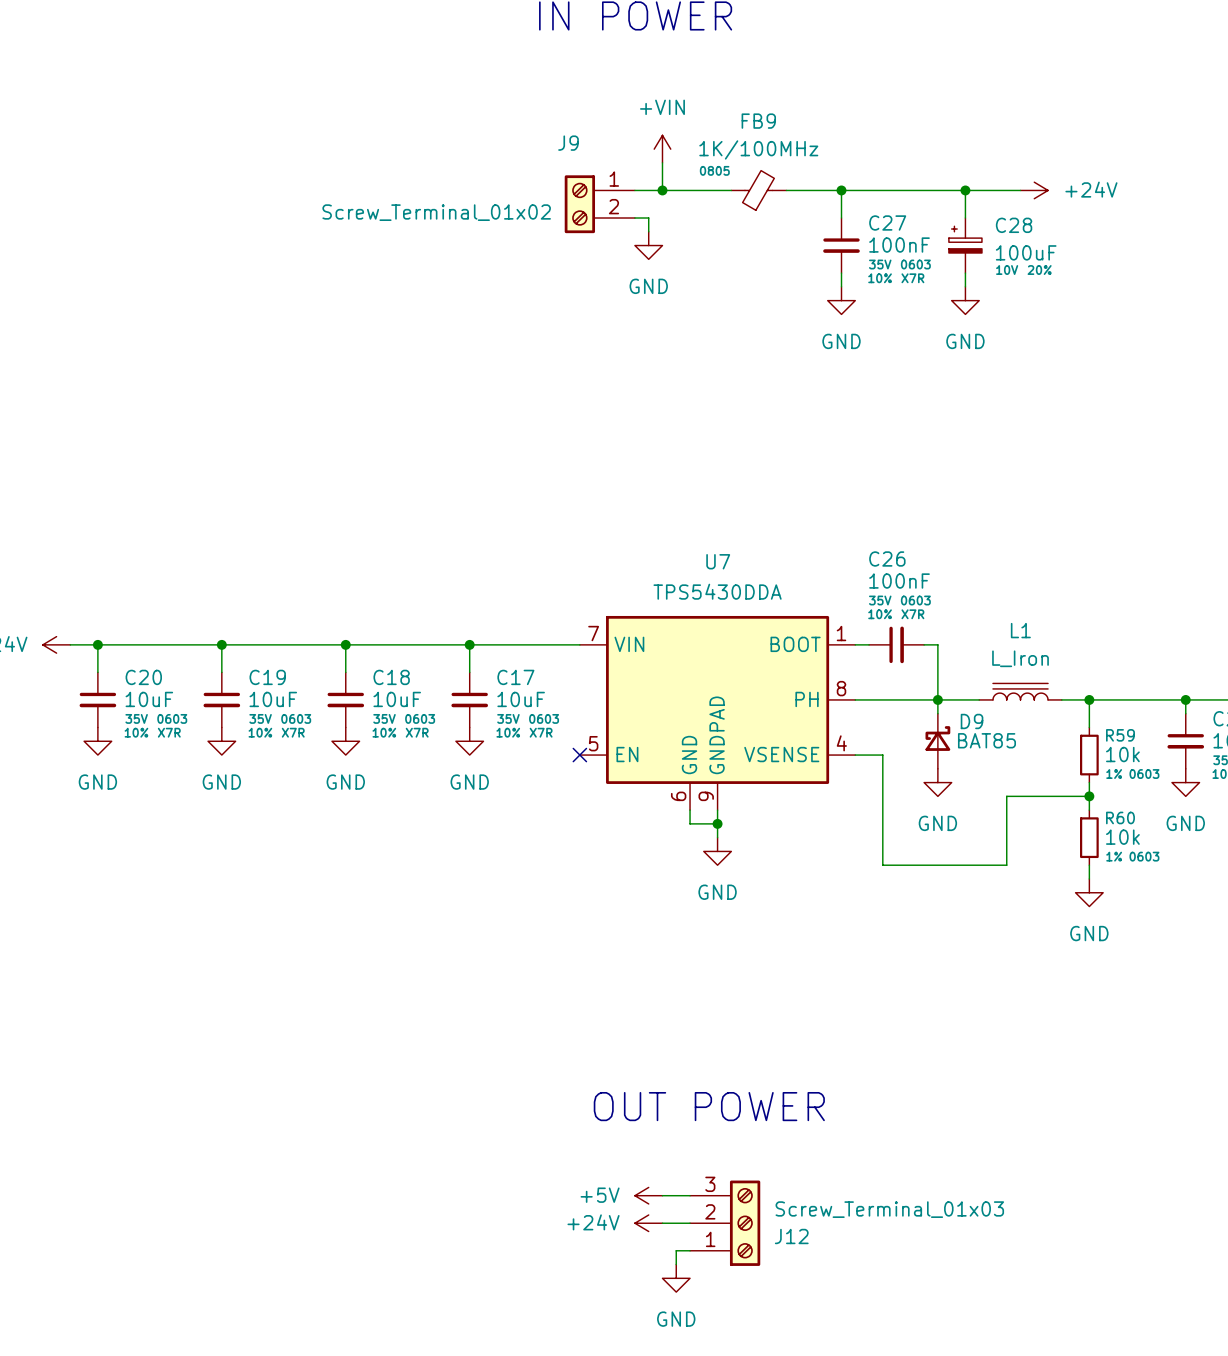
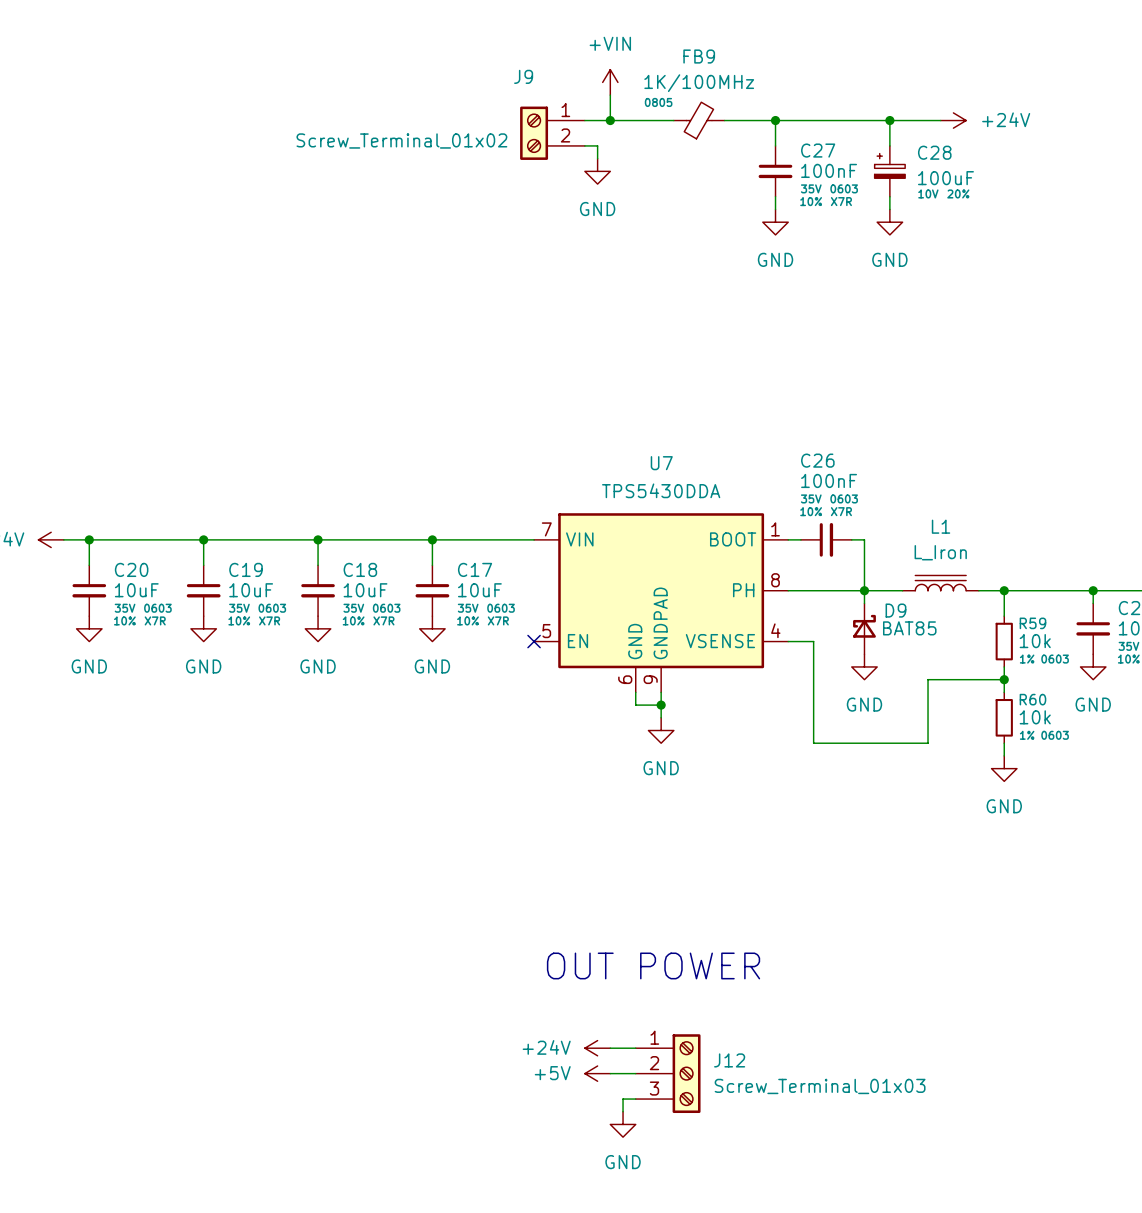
power symbol: +5V (648, 1195) -> +24V (597, 1048)
power symbol: +24V (648, 1223) -> +5V (597, 1073)
J12 flip: as is (745, 1223) -> up-down (686, 1073)

